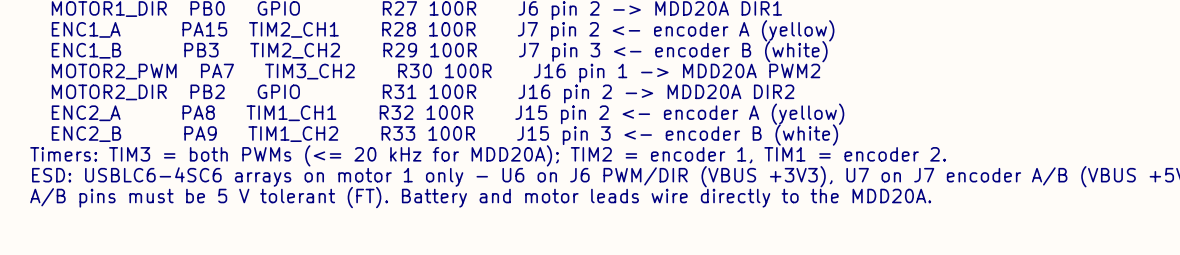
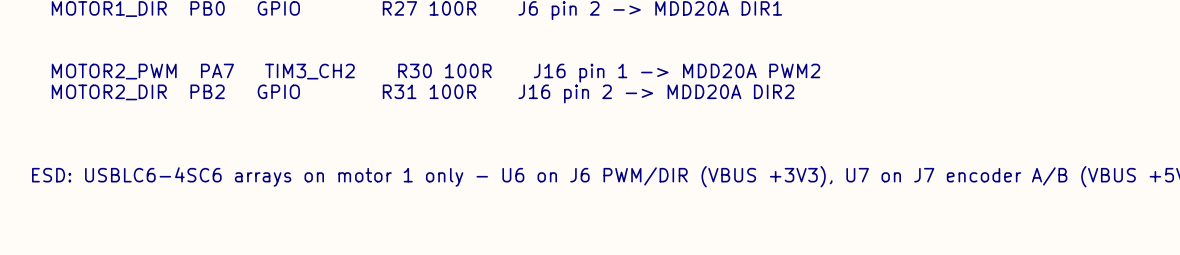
text: ENC1_A PA15 TIM2_CH1 R28 100R J7 pin 2 <- encoder A (yellow) (443, 30) -> none
text: ENC1_B PB3 TIM2_CH2 R29 100R J7 pin 3 <- encoder B (white) (439, 51) -> none
text: ENC2_A PA8 TIM1_CH1 R32 100R J15 pin 2 <- encoder A (yellow) (448, 114) -> none
text: ENC2_B PA9 TIM1_CH2 R33 100R J15 pin 3 <- encoder B (white) (444, 135) -> none
text: Timers: TIM3 = both PWMs (<= 20 kHz for MDD20A); TIM2 = encoder 1, TIM1 = encoder 2. (488, 155) -> none
text: A/B pins must be 5 V tolerant (FT). Battery and motor leads wire directly to the MDD20A. (480, 197) -> none

